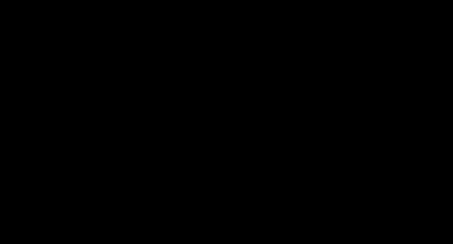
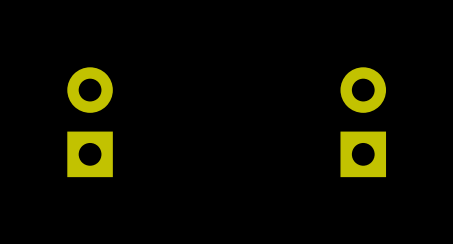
part: none -> (90, 122)
part: none -> (363, 122)

